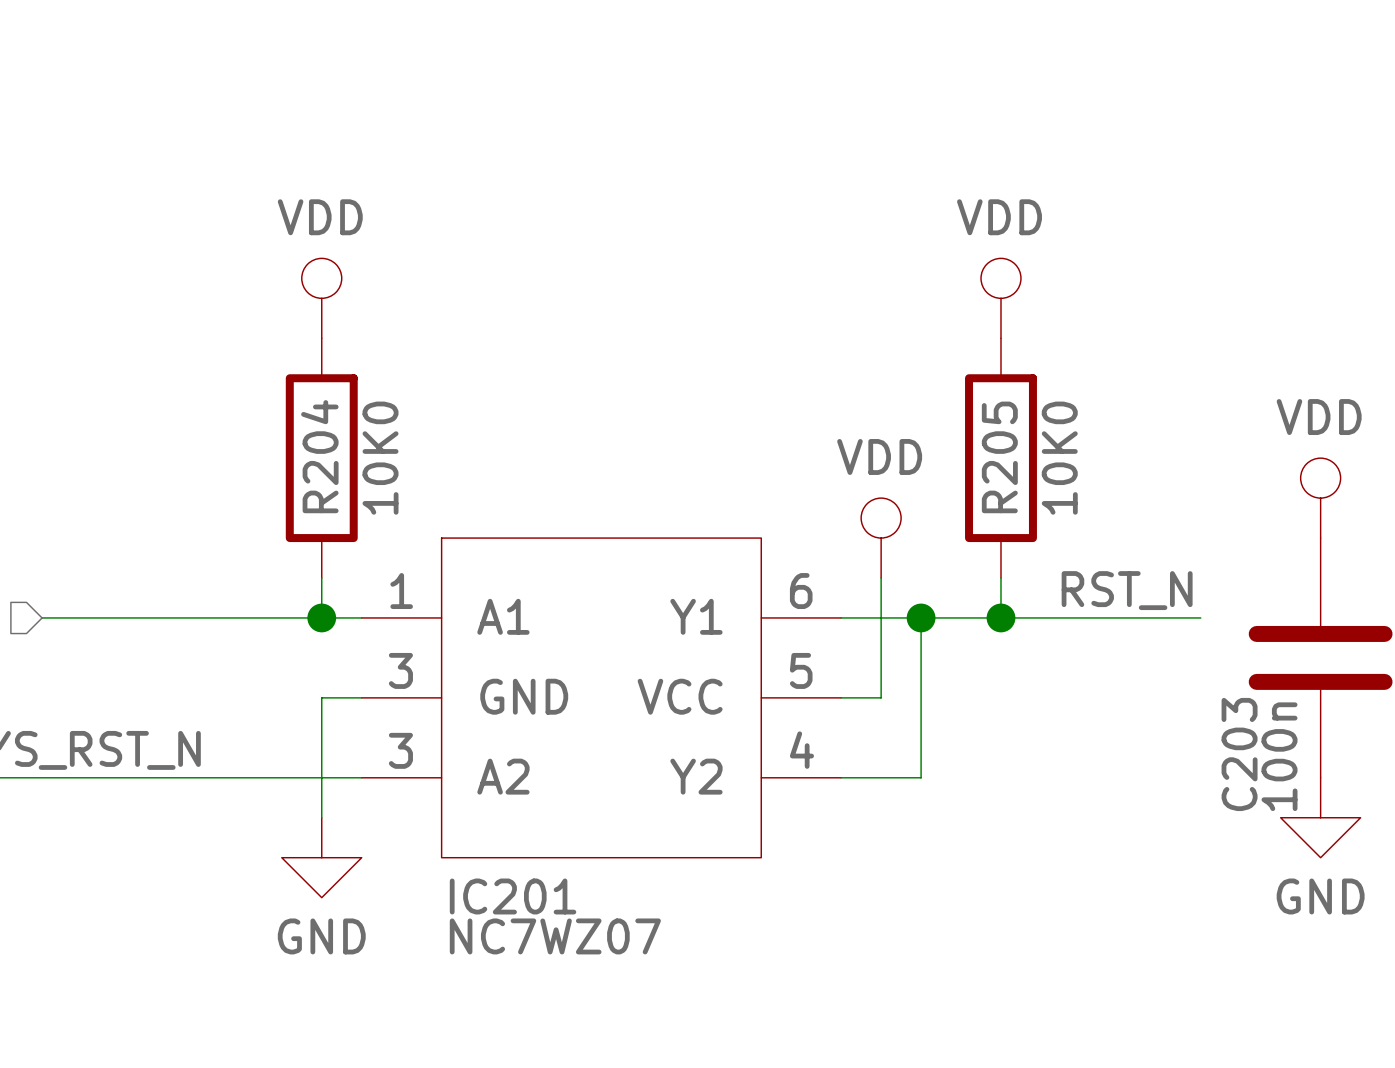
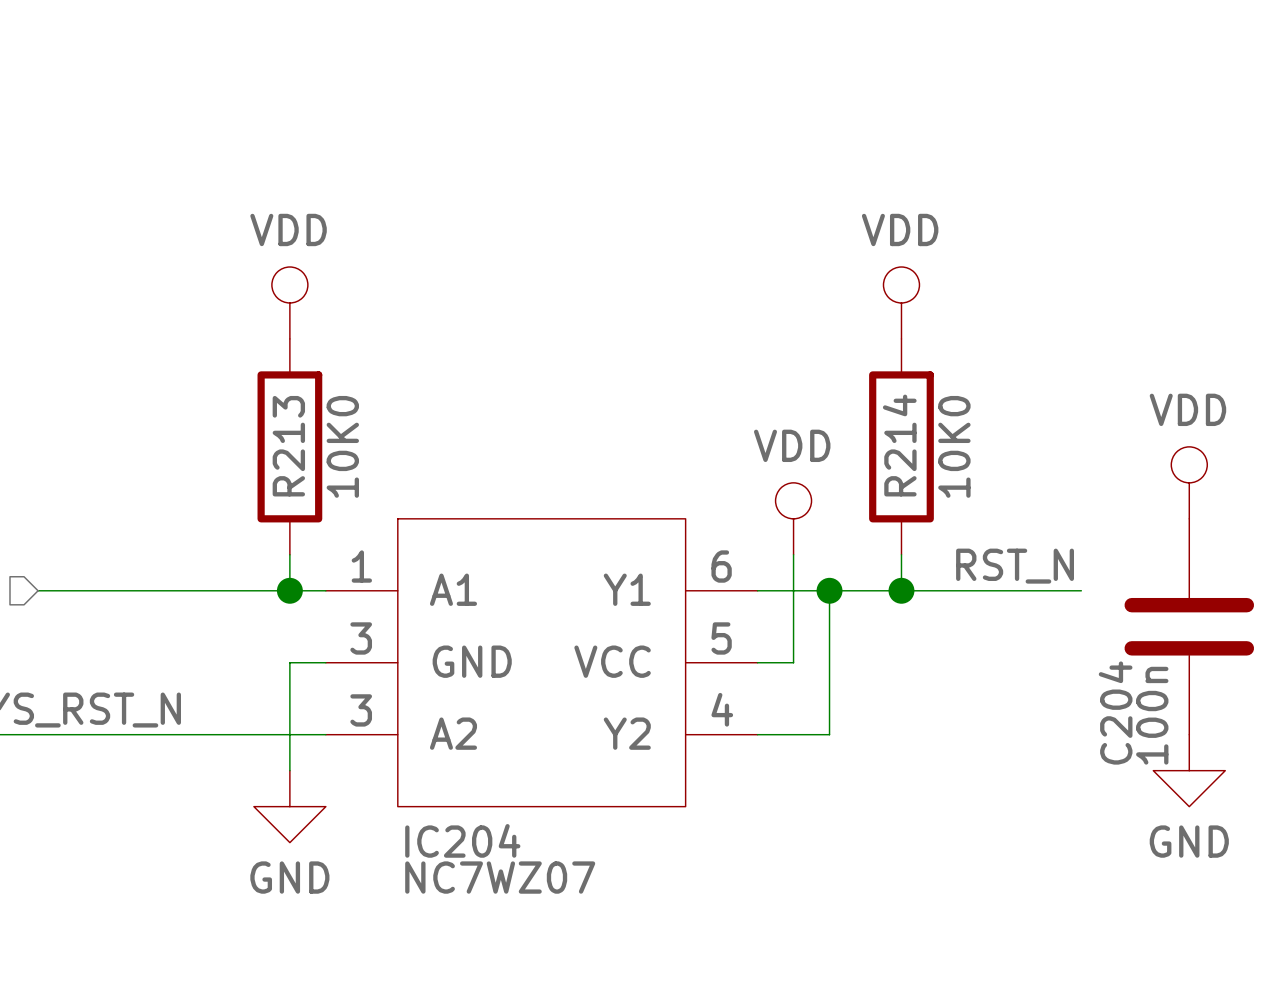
R204 name: R204 (319, 456) -> R213 (288, 446)
R205 name: R205 (999, 457) -> R214 (899, 445)
C203 name: C203 (1239, 754) -> C204 (1115, 713)
IC201 name: IC201 (513, 896) -> IC204 (462, 840)

